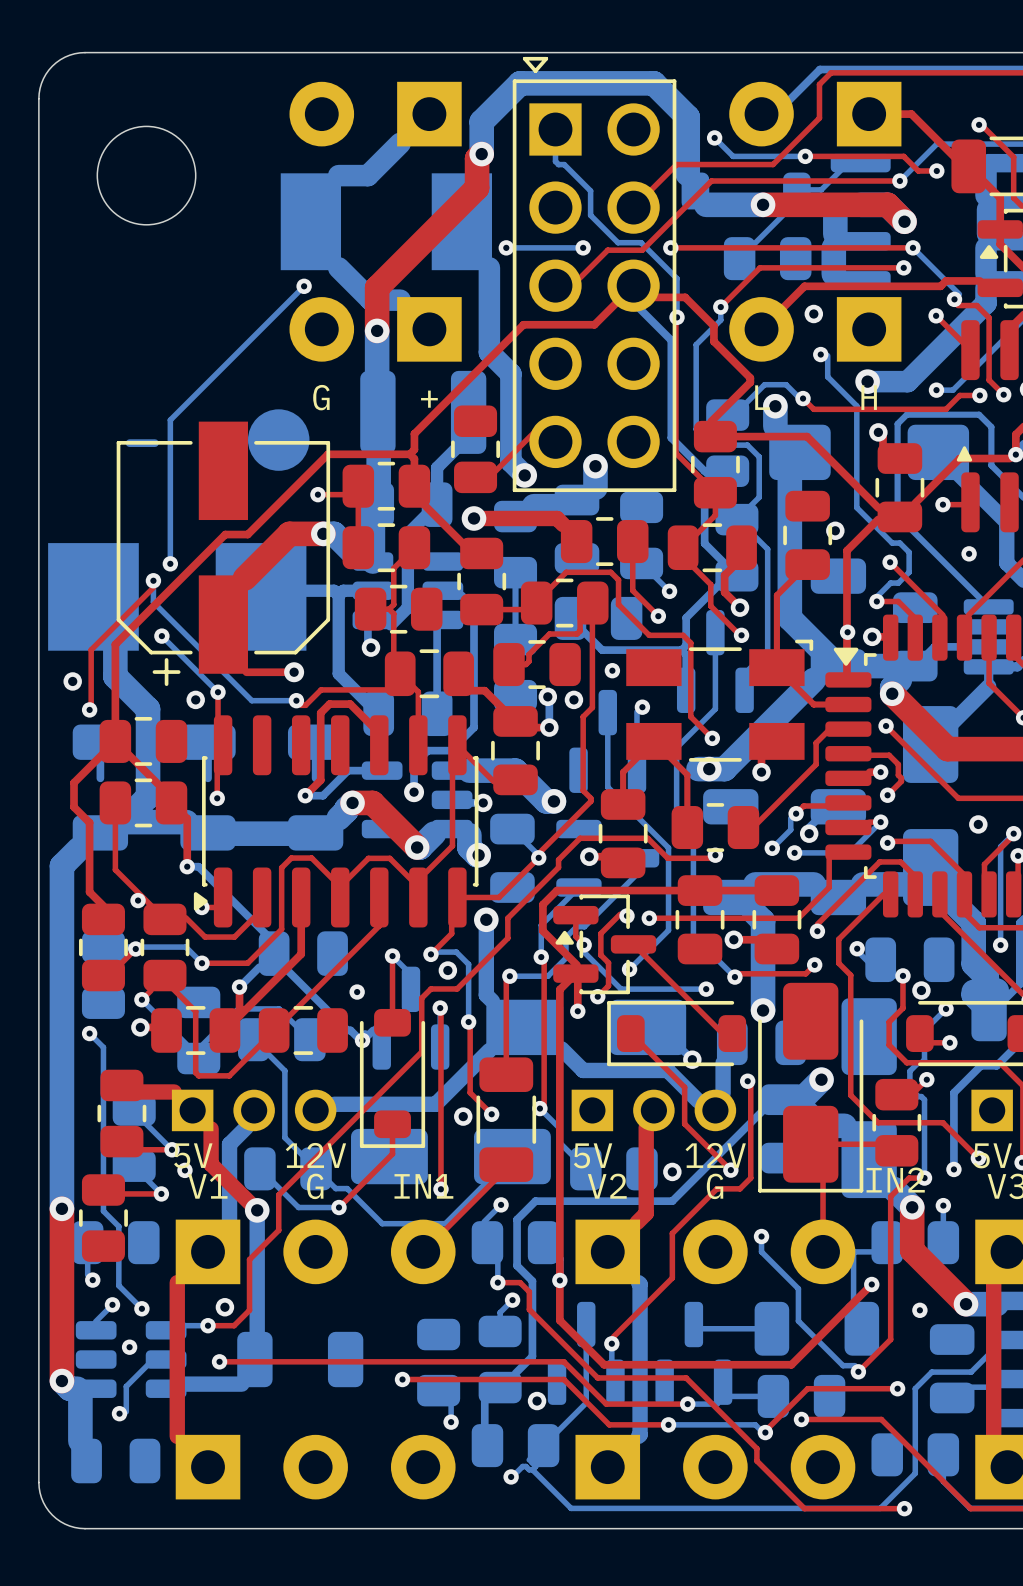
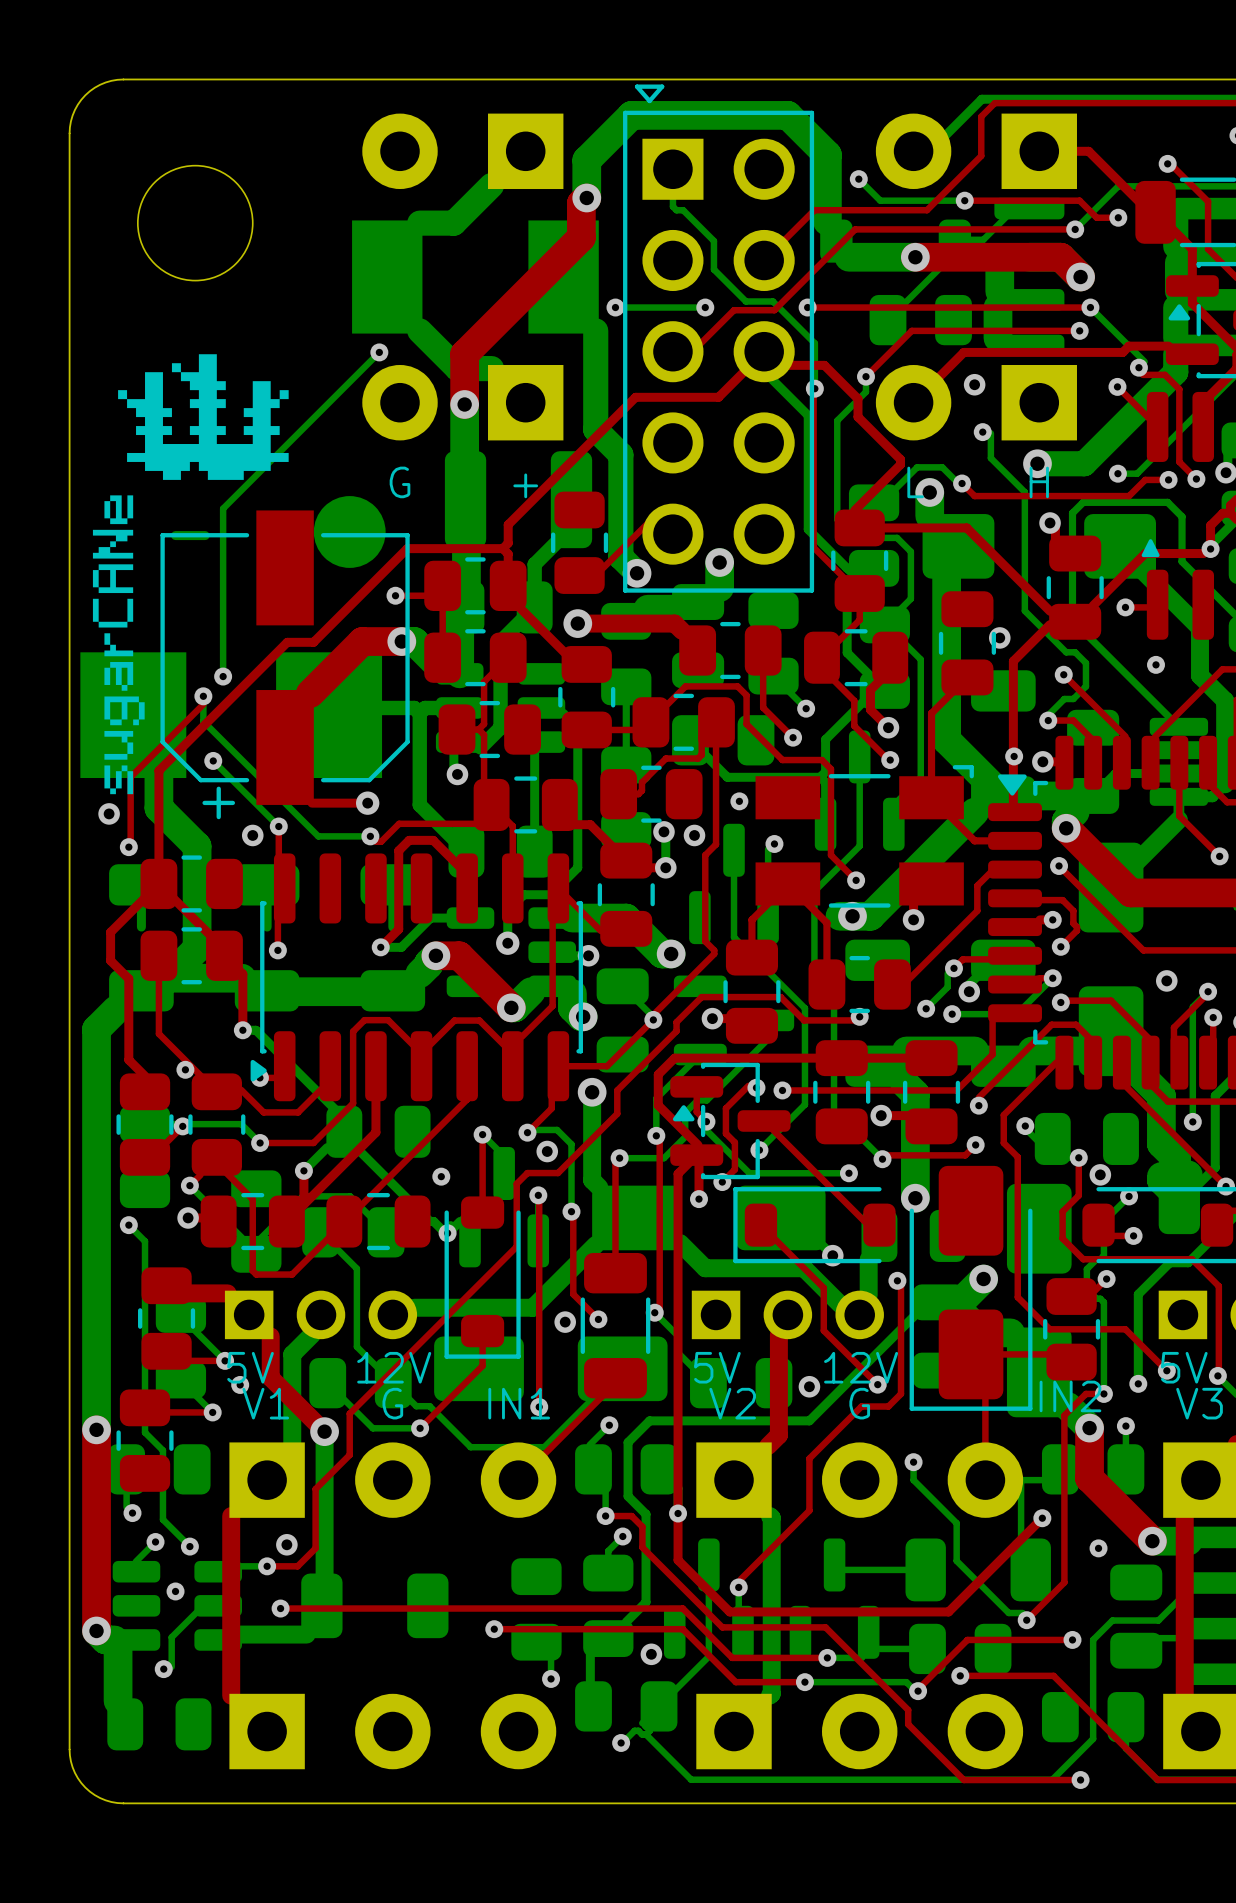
drawing: none -> [92, 354, 289, 795]

